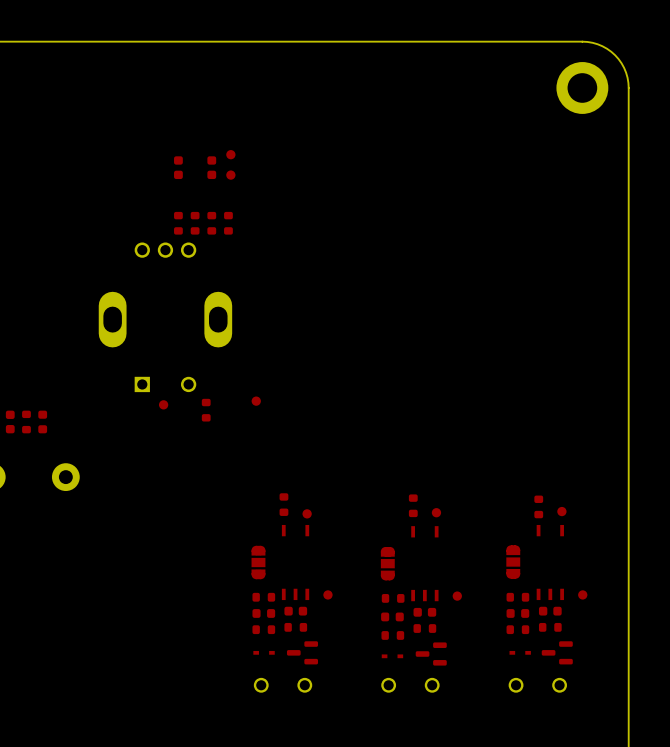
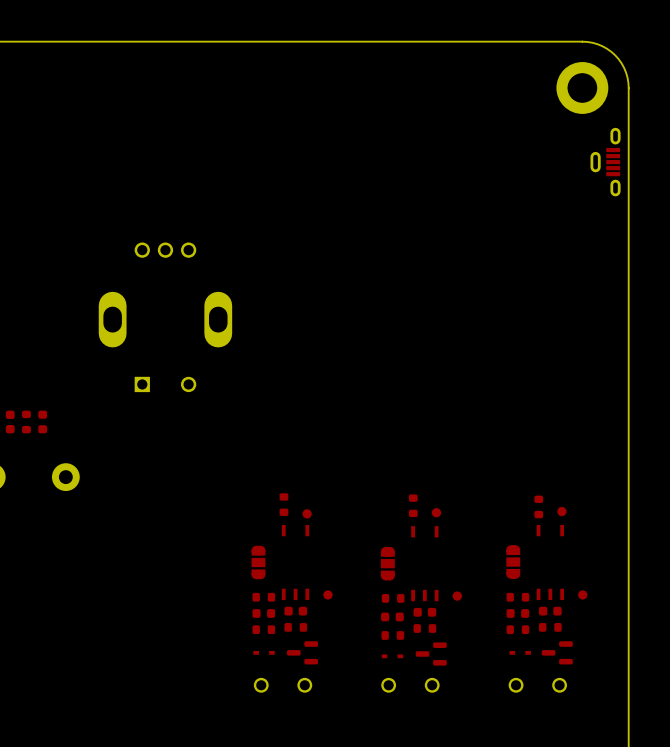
part: (230, 154) -> none
part: none -> (605, 162)
part: (178, 167) -> none
part: (211, 167) -> none
part: (230, 175) -> none
part: (178, 223) -> none
part: (195, 223) -> none
part: (211, 223) -> none
part: (228, 223) -> none
part: (256, 401) -> none
part: (163, 404) -> none
part: (206, 410) -> none

